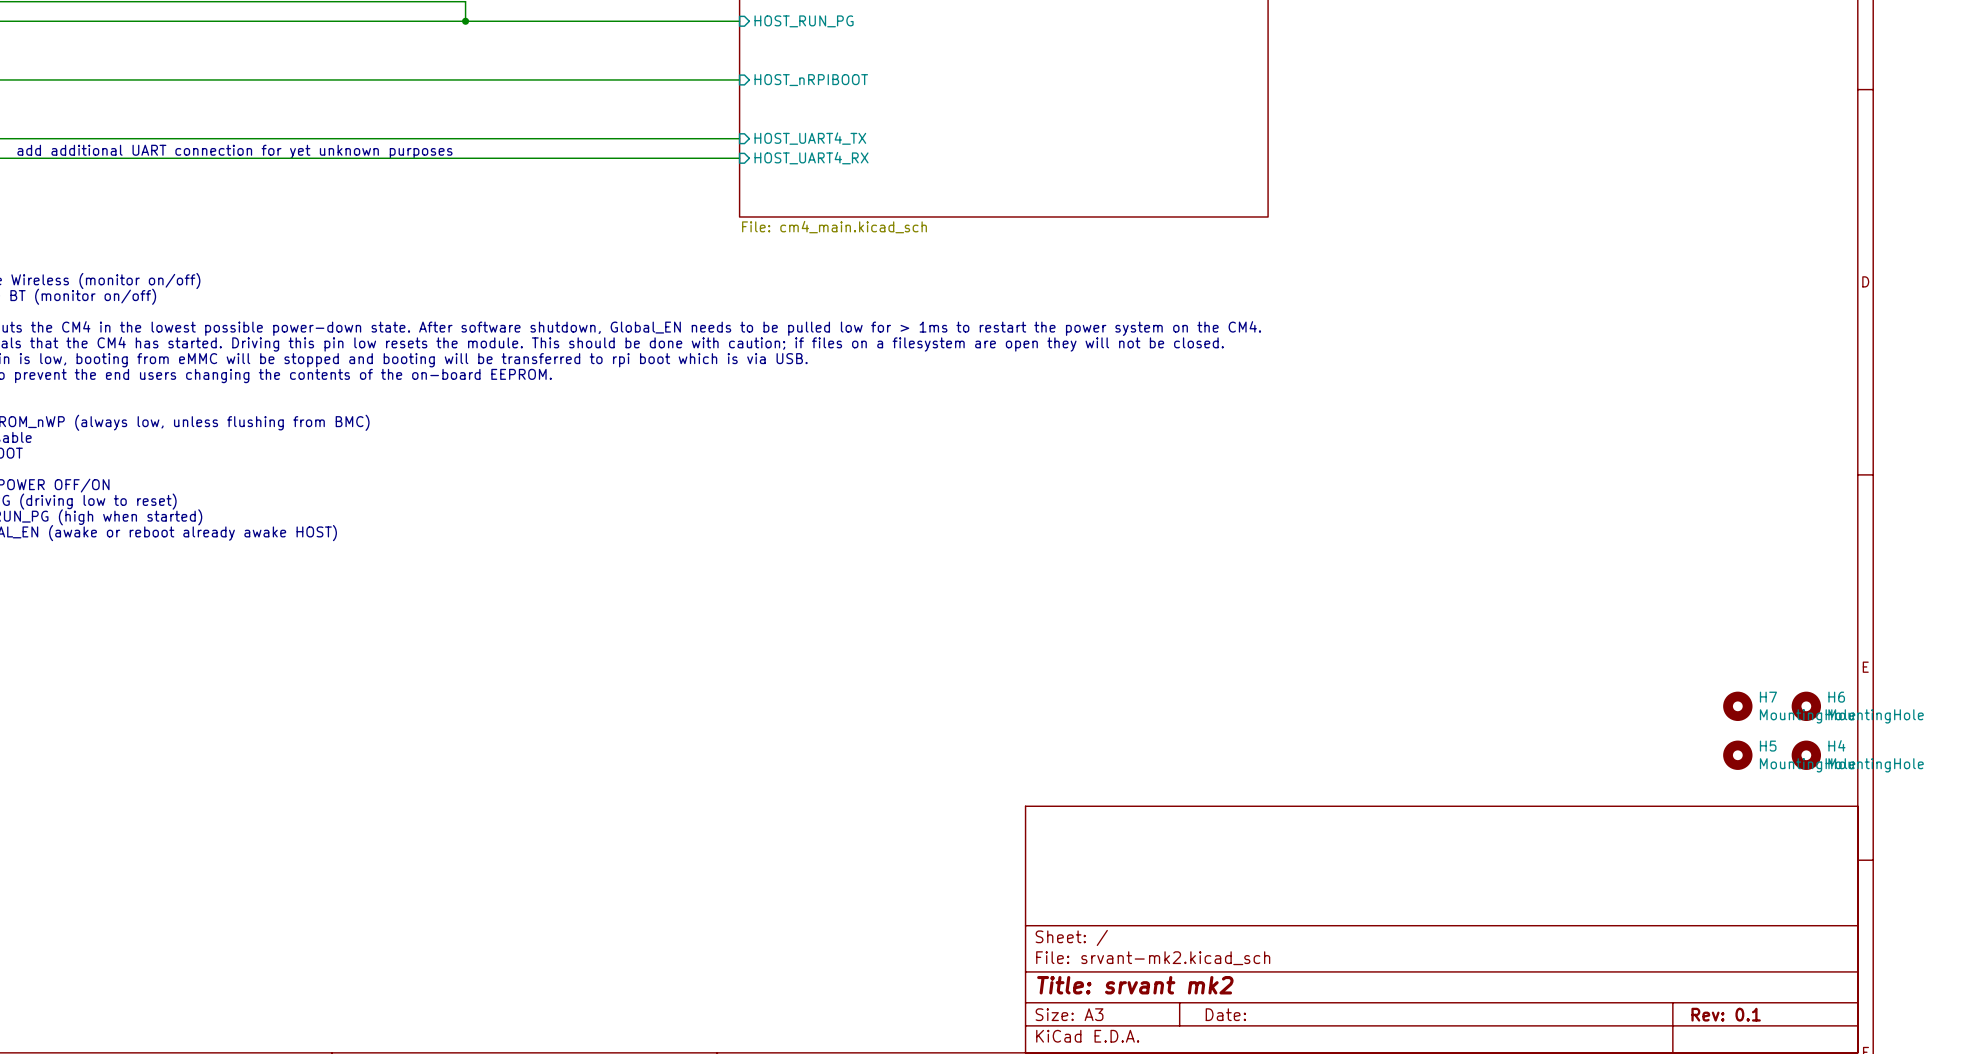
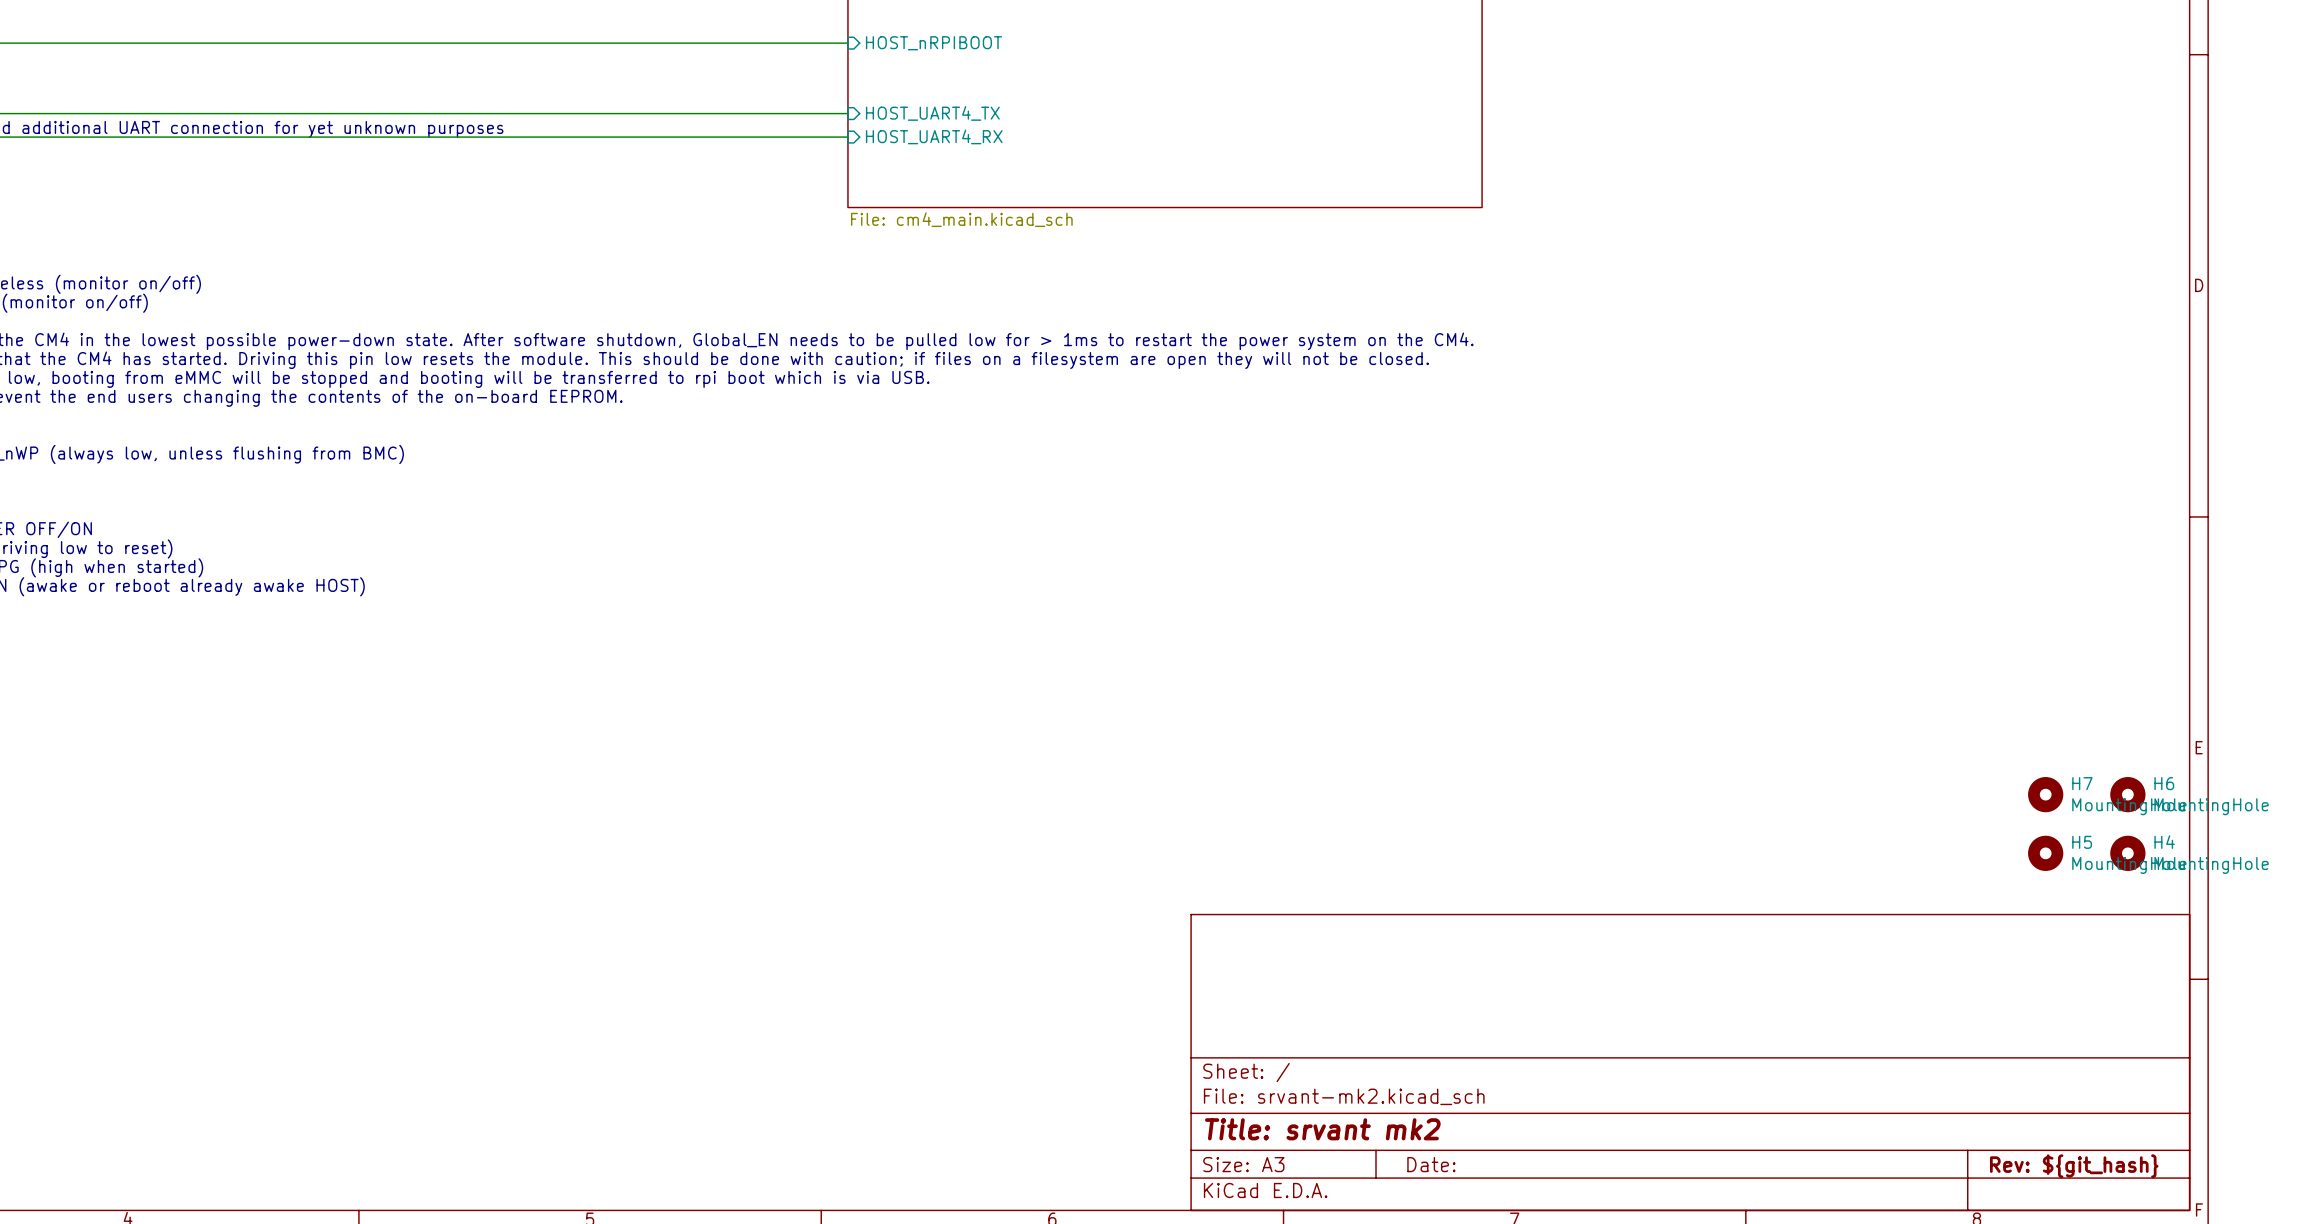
title block: Rev: 0.1 (1726, 1014) -> Rev: ${git_hash} (2074, 1166)

